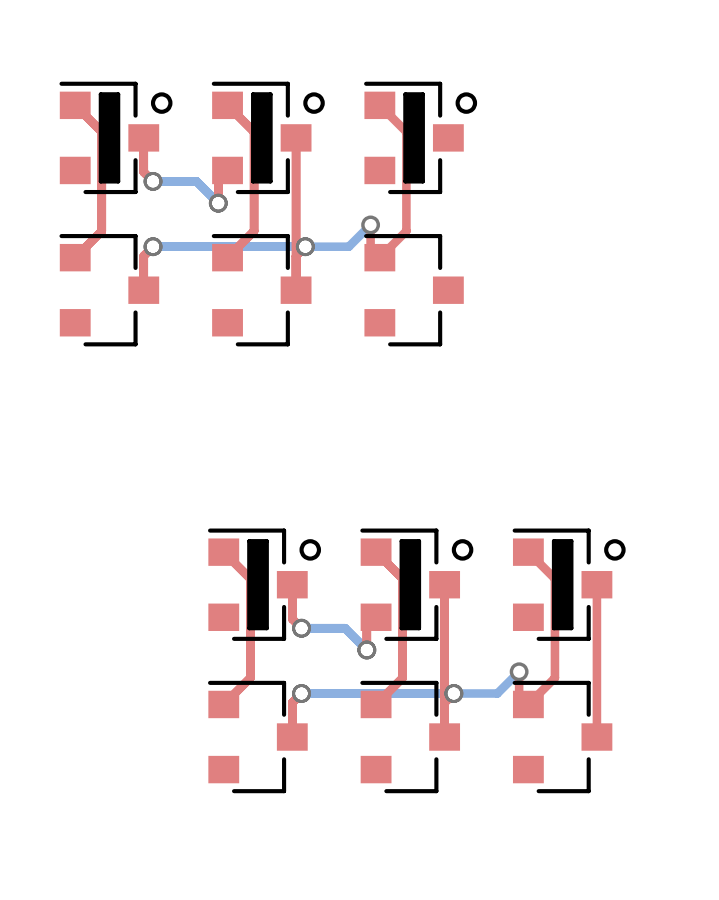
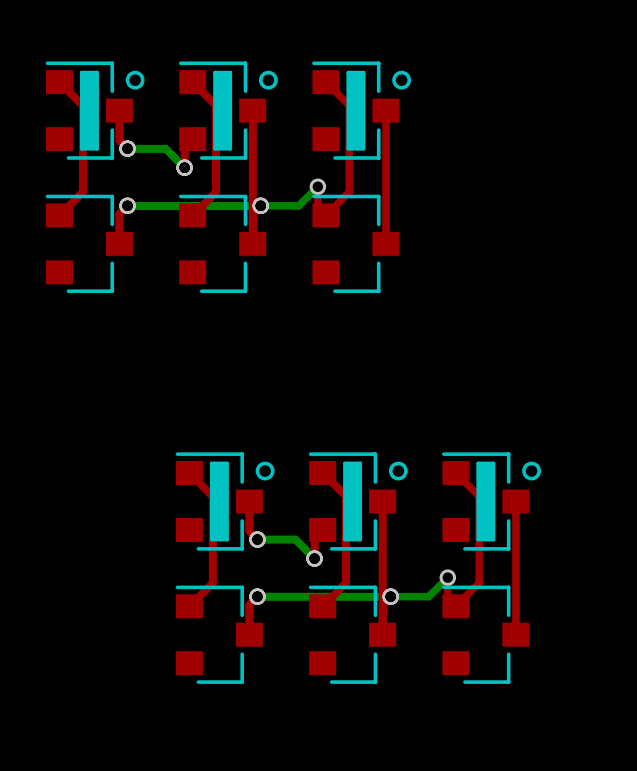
top track: none -> (385, 110) (385, 243)

